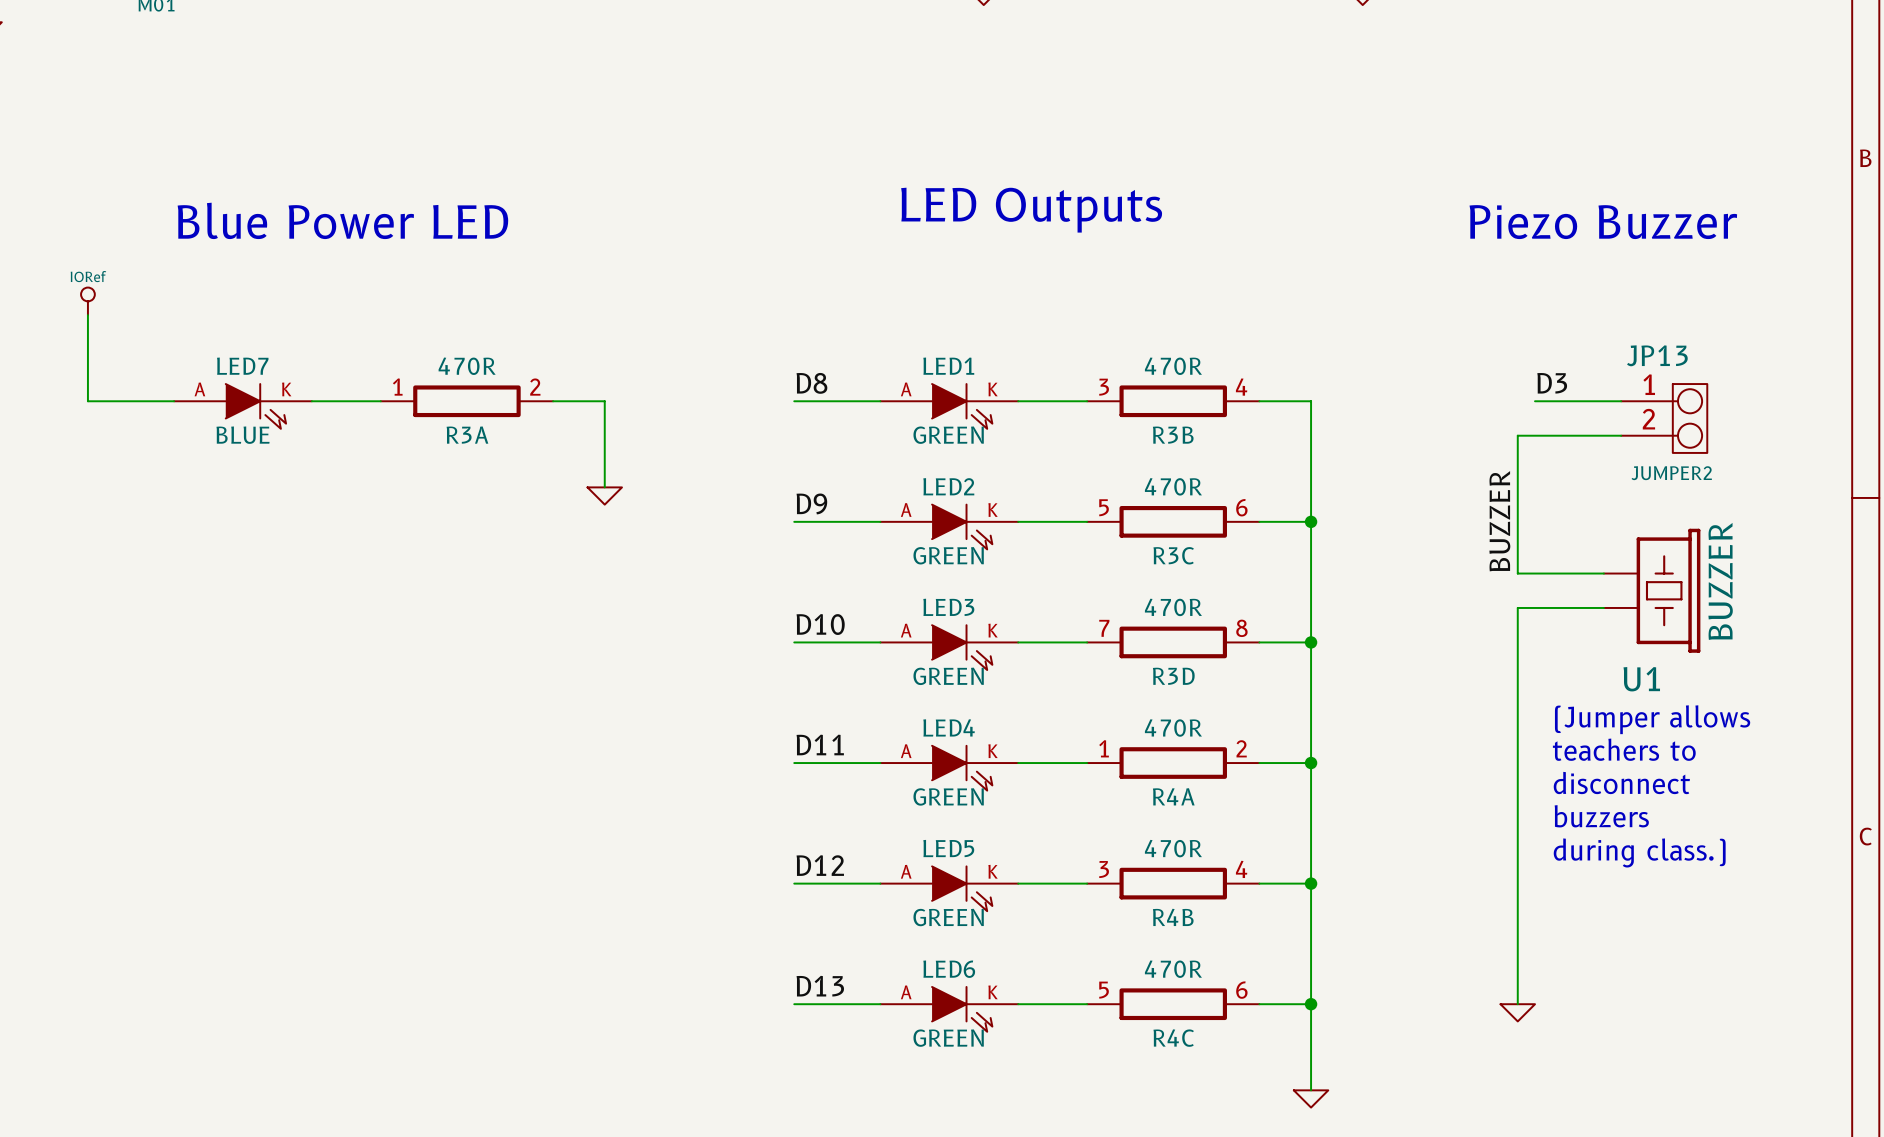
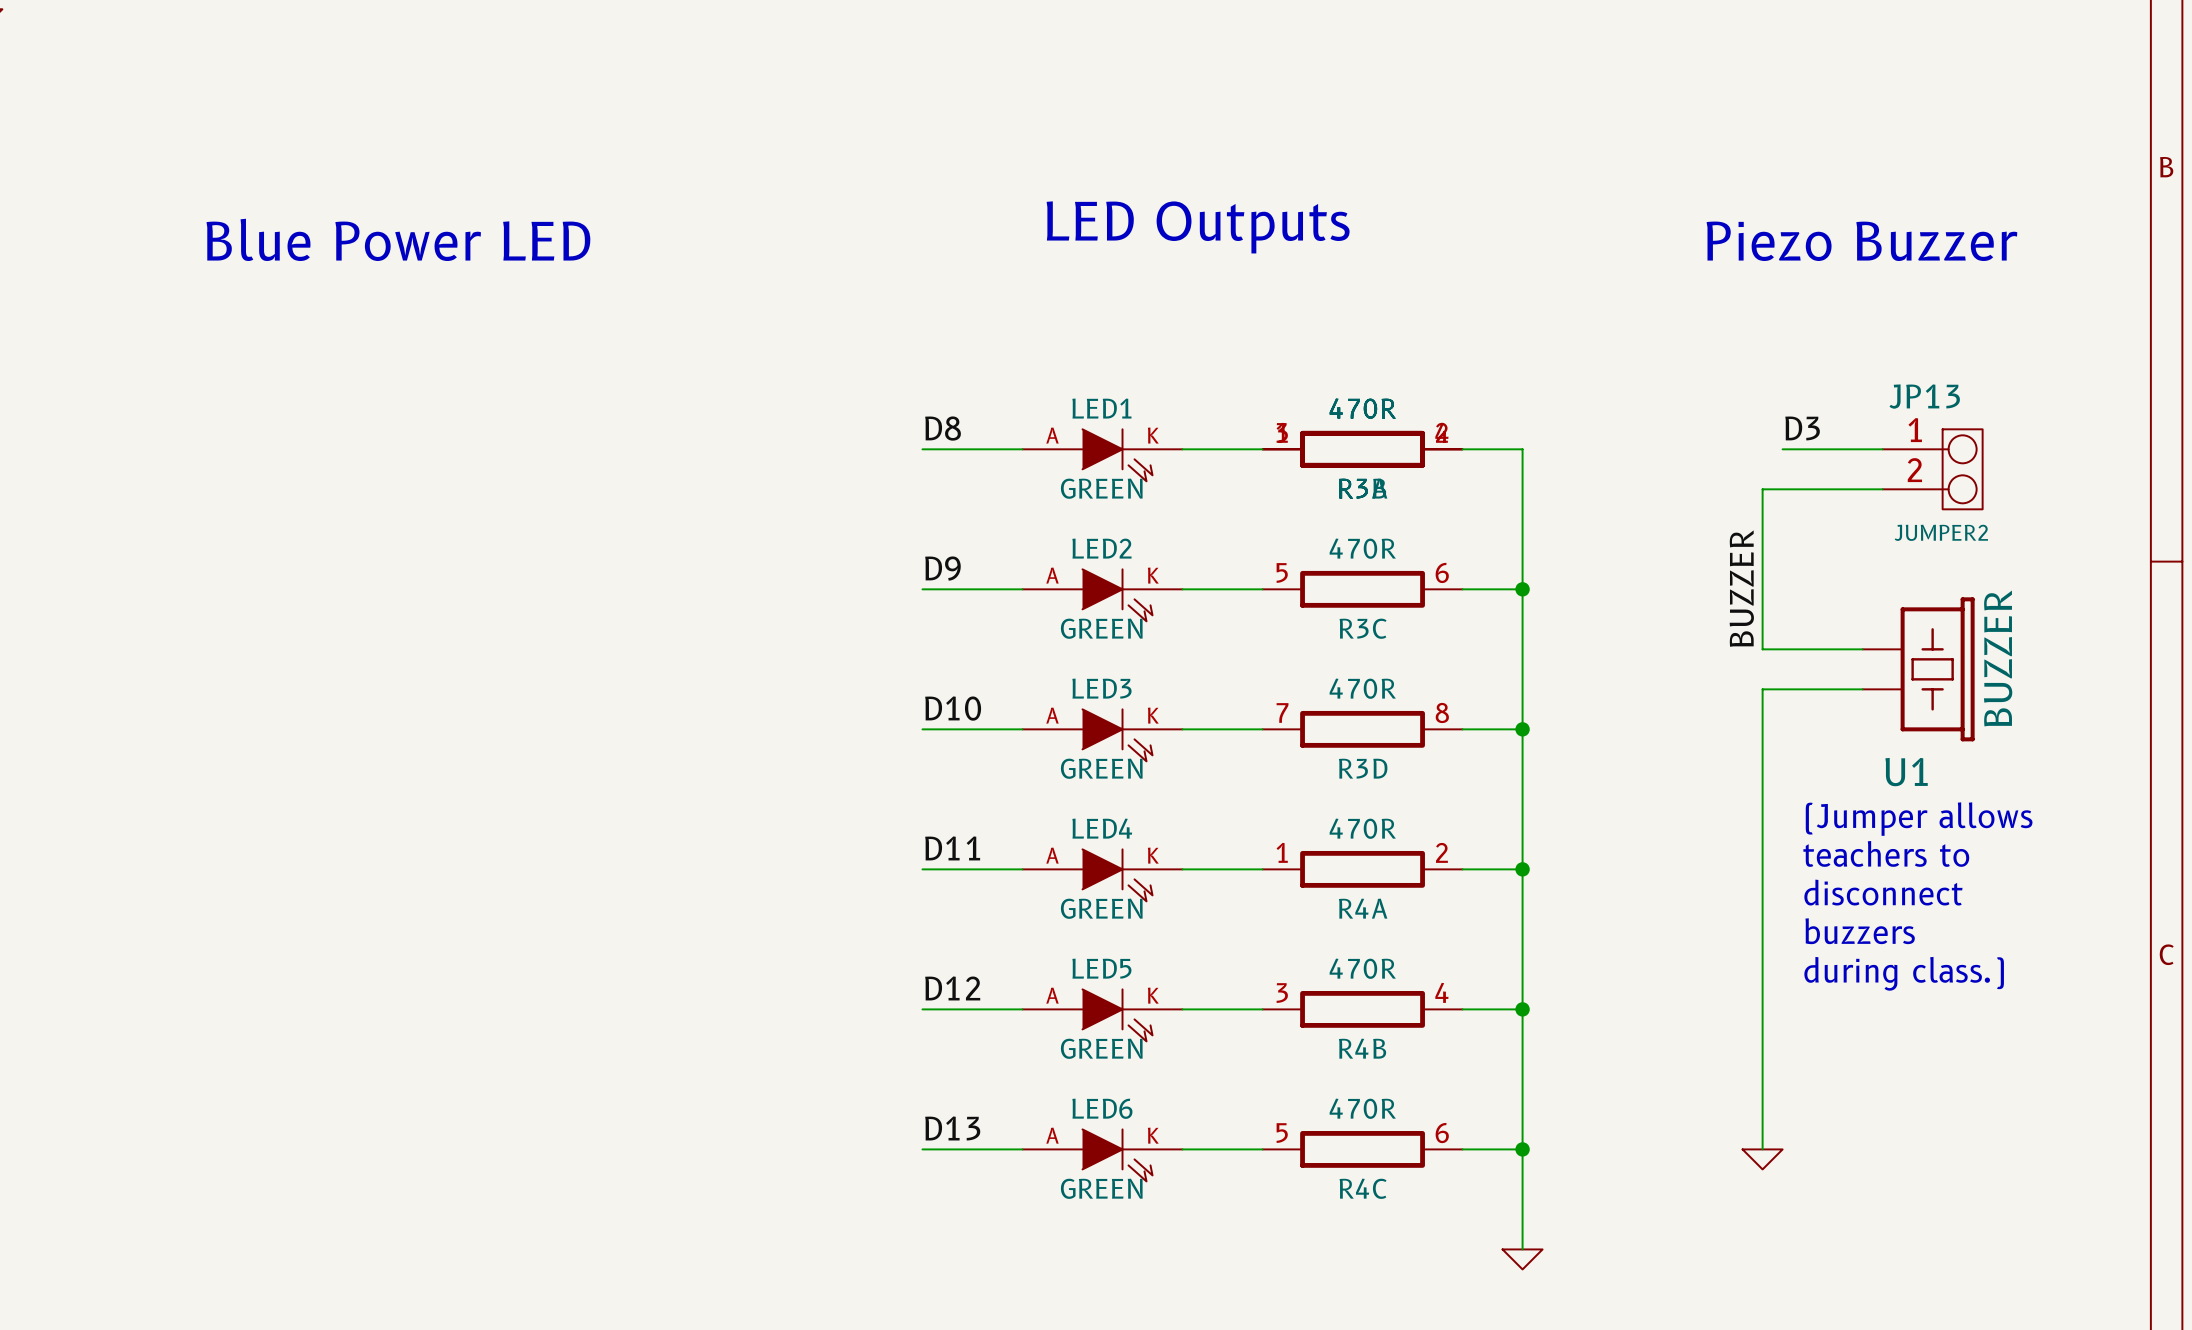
power symbol: IORef (87, 301) -> none
wire: (87, 315) (87, 401) (174, 401) -> none
wire: (311, 401) (380, 401) -> none
R3A position: (466, 401) -> (1362, 449)
wire: (553, 401) (604, 401) (604, 487) -> none
LED7: BLUE (242, 406) -> none
power symbol: (604, 496) -> none

